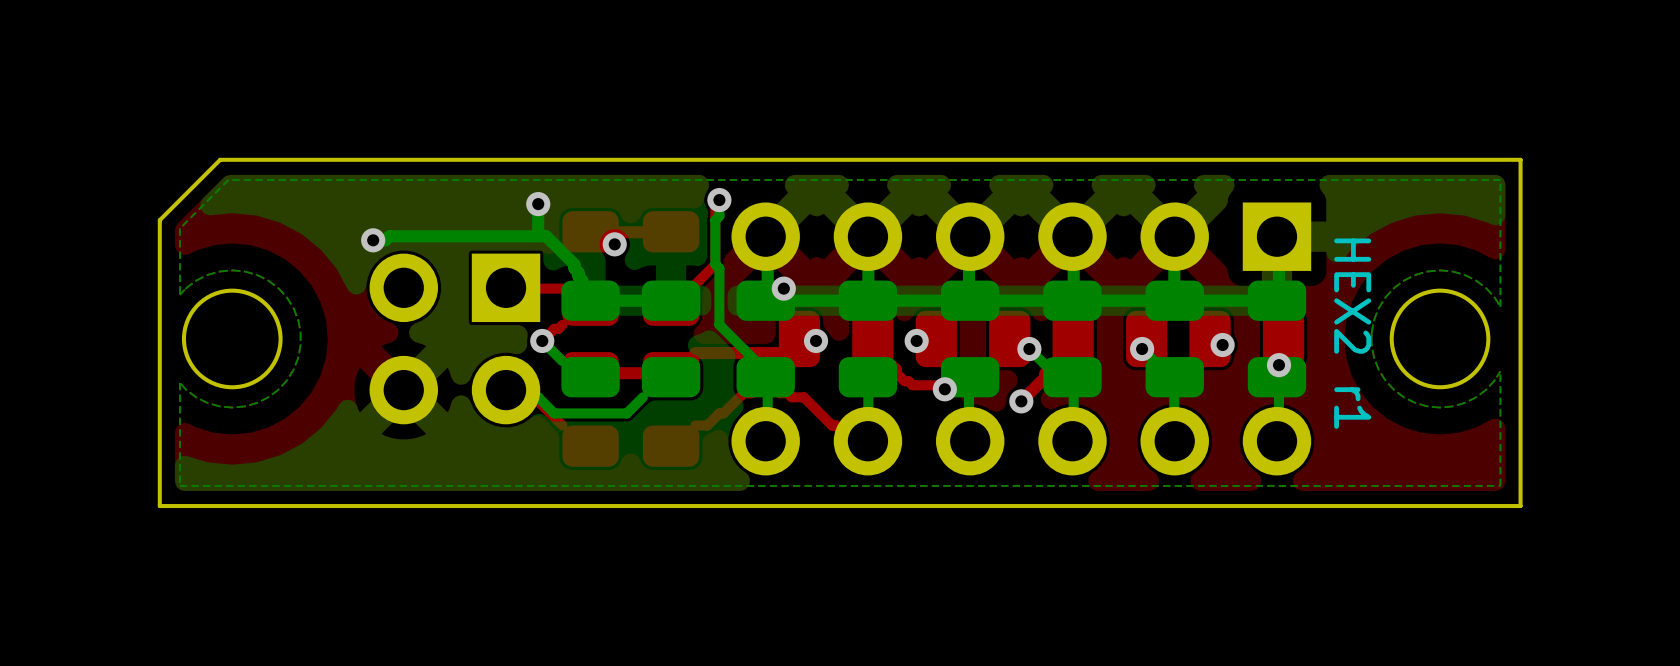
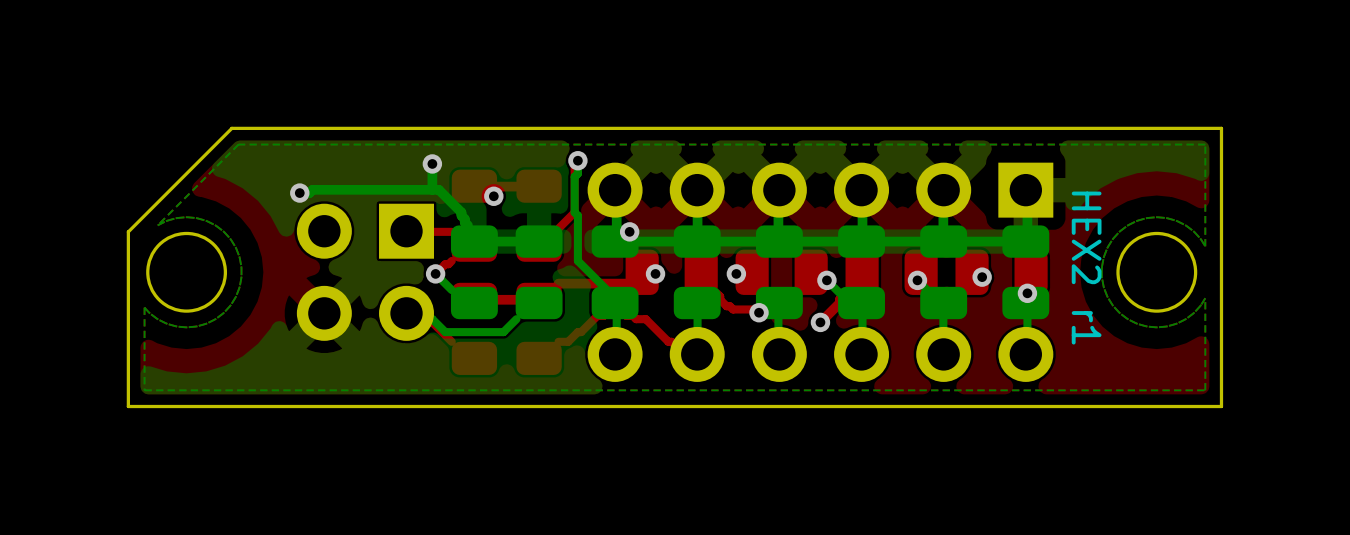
board edge: (288, 159) (220, 159) (159, 220) (159, 288) -> (231, 128) (128, 231)
bottom zone outline: (296, 179) (228, 179) (179, 228) (179, 294) (196, 280) -> (238, 144) (157, 225)

